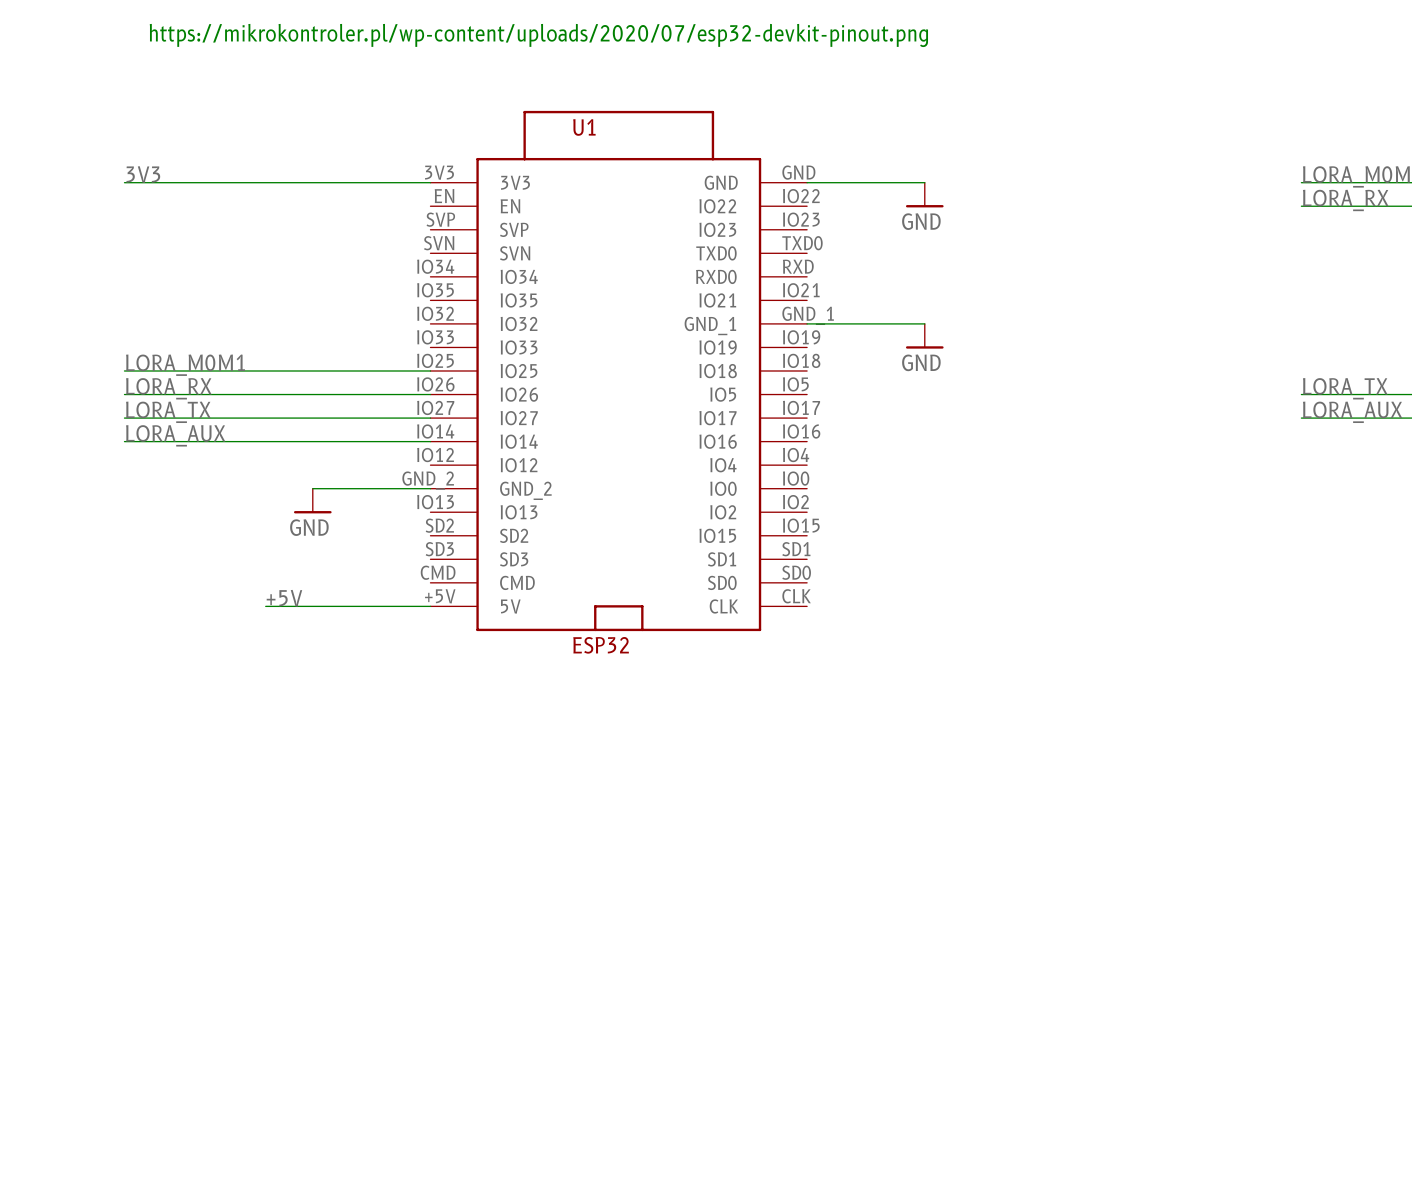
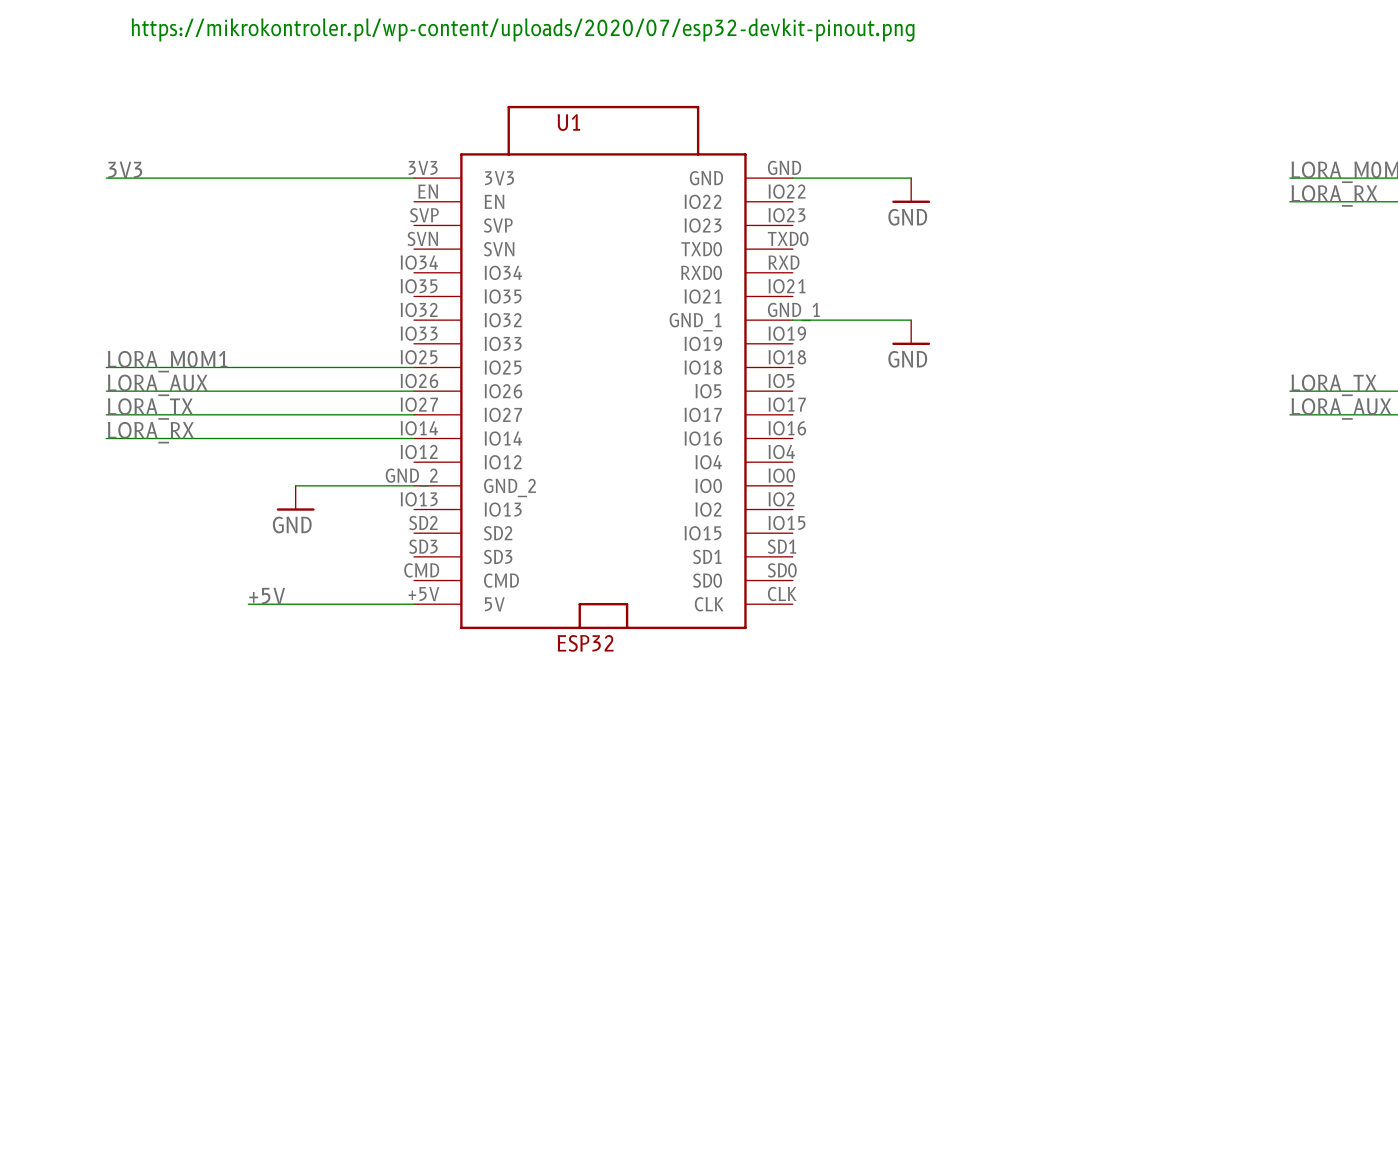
label: LORA_RX (168, 388) -> LORA_AUX (157, 385)
label: LORA_AUX (175, 435) -> LORA_RX (150, 432)

